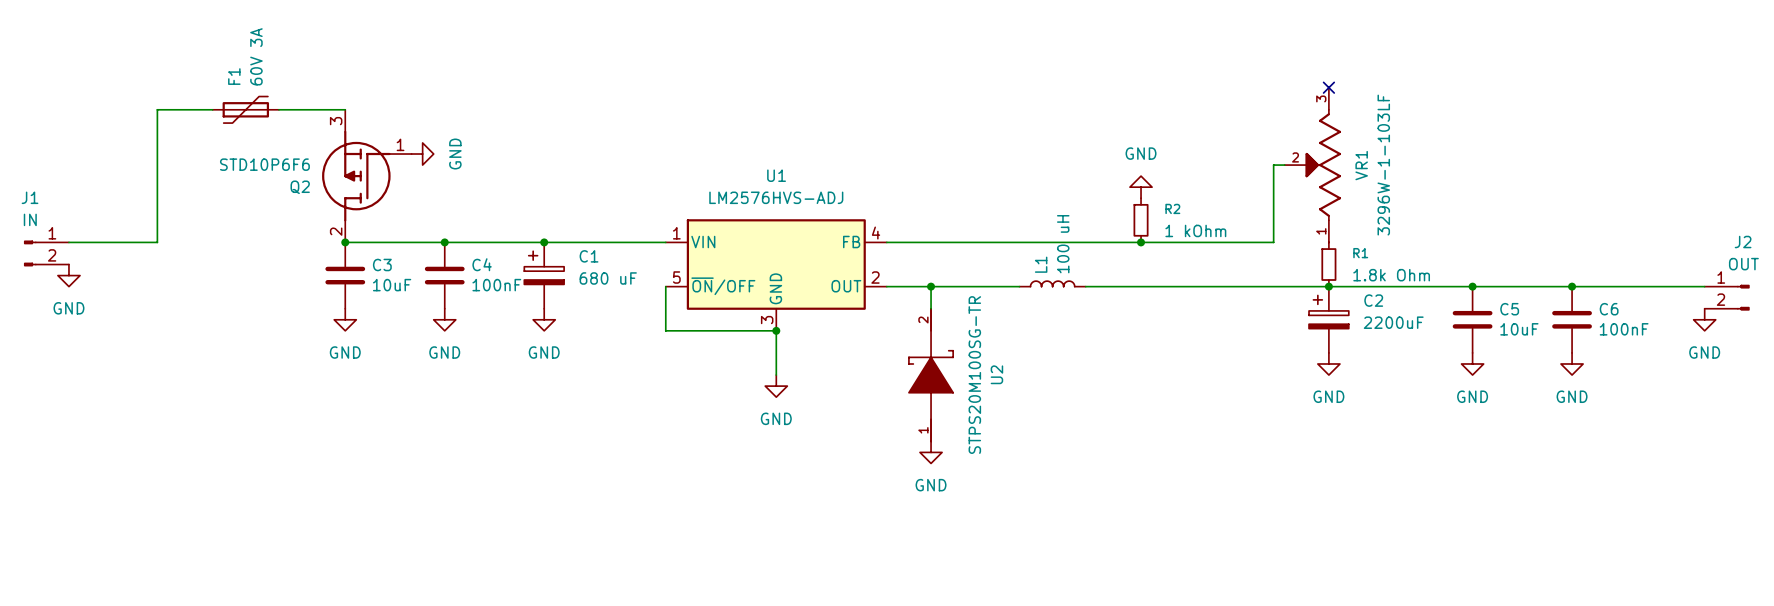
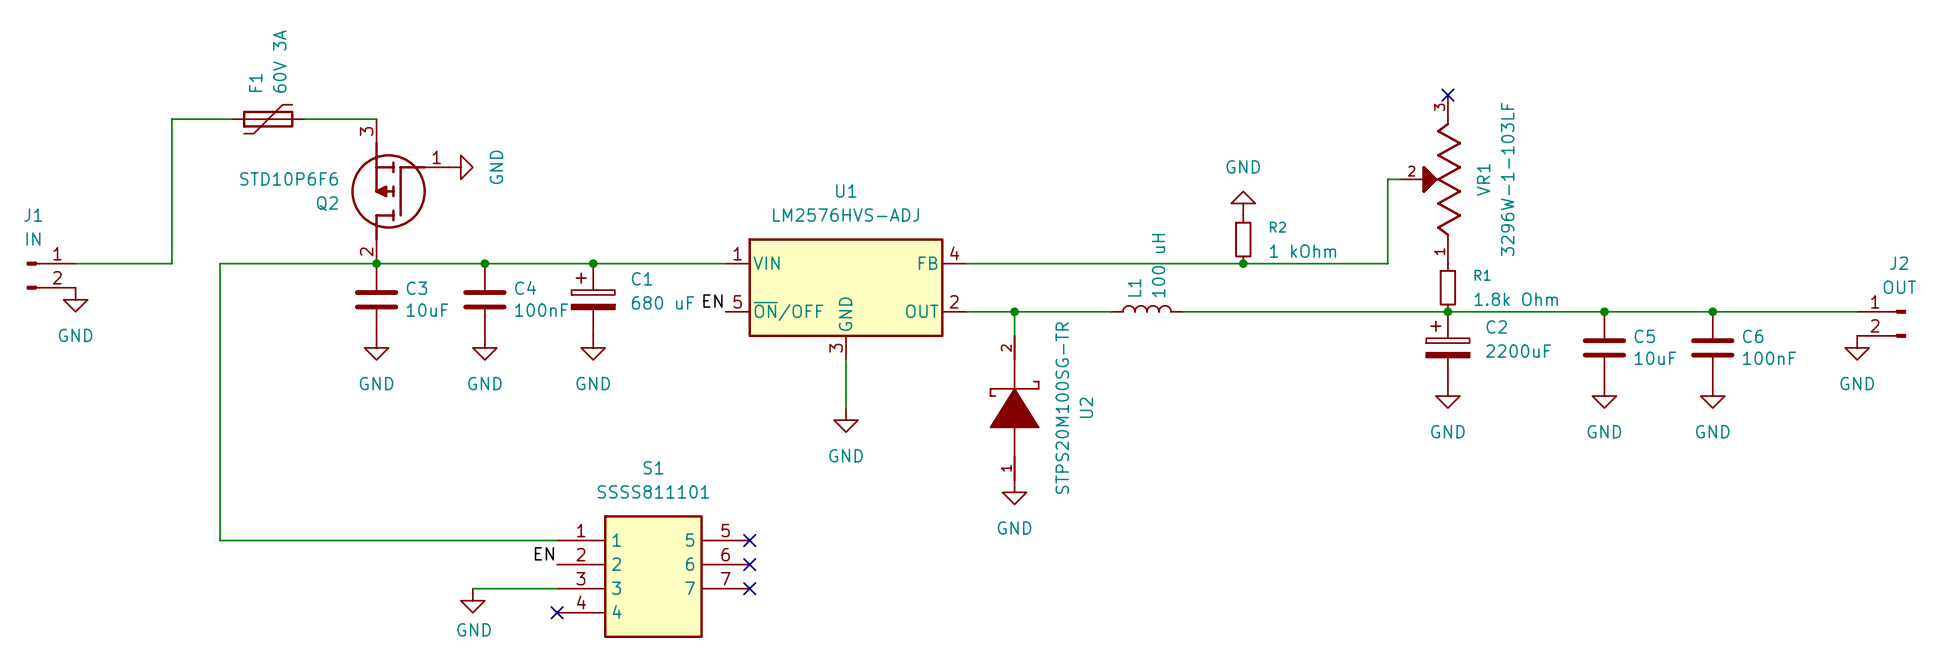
wire: none -> (376, 263) (220, 263) (220, 540) (557, 540)
label: none -> EN (712, 301)
wire: (665, 286) (665, 330) (776, 330) -> none
junction: (776, 330) -> none
no-connect mark: none -> (749, 540)
label: none -> EN (544, 553)
no-connect mark: none -> (749, 564)
S1: none -> SSSS811101 (653, 576)
wire: none -> (472, 588) (557, 588)
no-connect mark: none -> (749, 588)
power symbol: none -> GND (472, 600)
no-connect mark: none -> (557, 612)

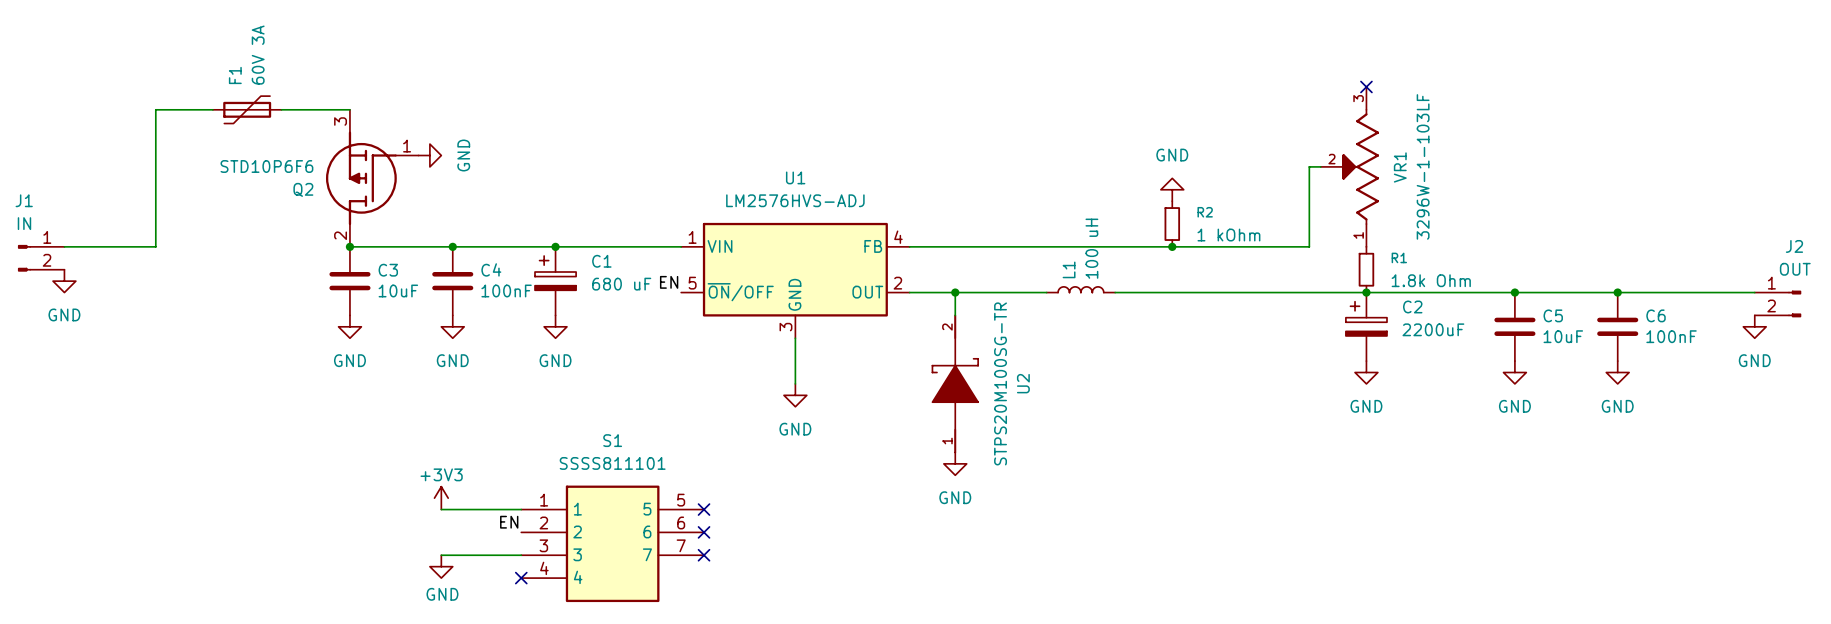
wire: (376, 263) (220, 263) (220, 540) (472, 540) -> none
power symbol: none -> +3V3 (441, 498)

